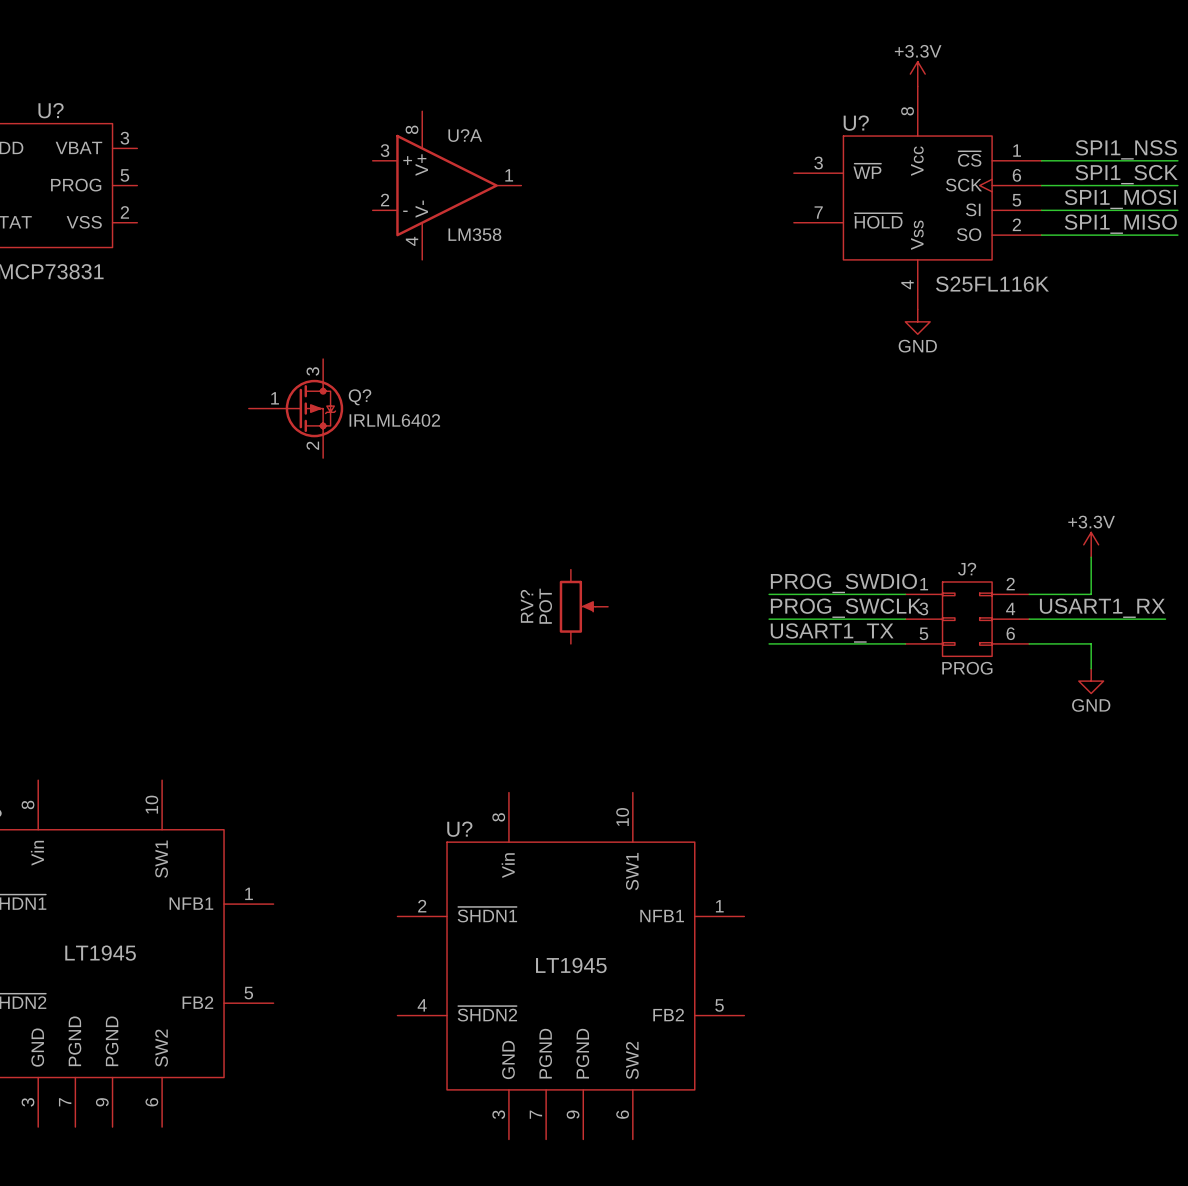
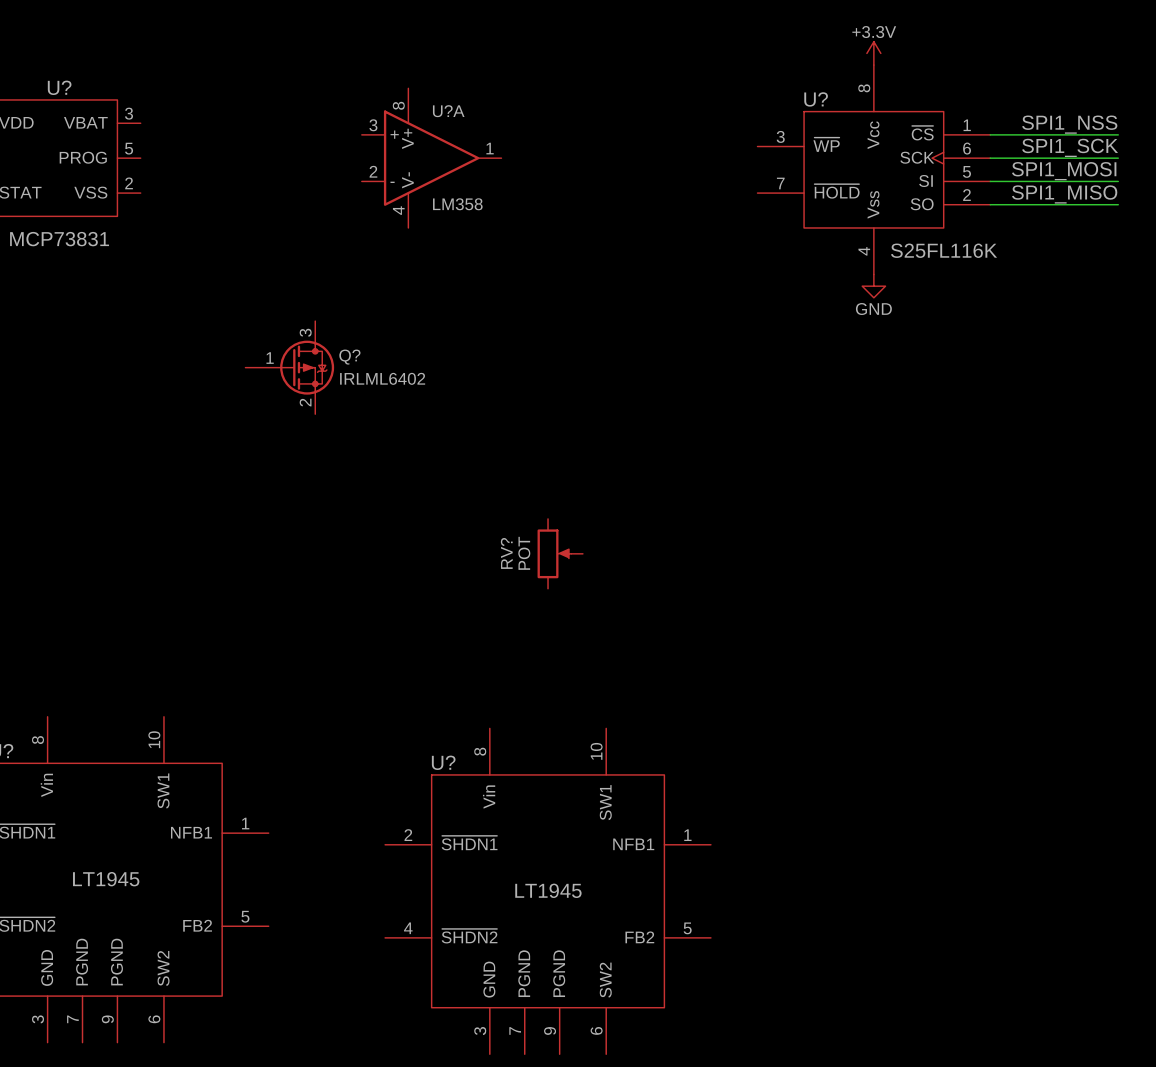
power symbol: +3.3V (1091, 544) -> none
wire: (1091, 557) (1091, 594) (1029, 594) -> none
label: PROG_SWDIO (843, 583) -> none
wire: (769, 594) (905, 594) -> none
label: PROG_SWCLK (846, 608) -> none
label: USART1_RX (1102, 608) -> none
wire: (769, 619) (905, 619) -> none
J?: PROG (967, 619) -> none
wire: (1029, 619) (1165, 619) -> none
label: USART1_TX (832, 633) -> none
wire: (769, 643) (905, 643) -> none
wire: (1029, 643) (1091, 643) (1091, 668) -> none
power symbol: GND (1091, 681) -> none

